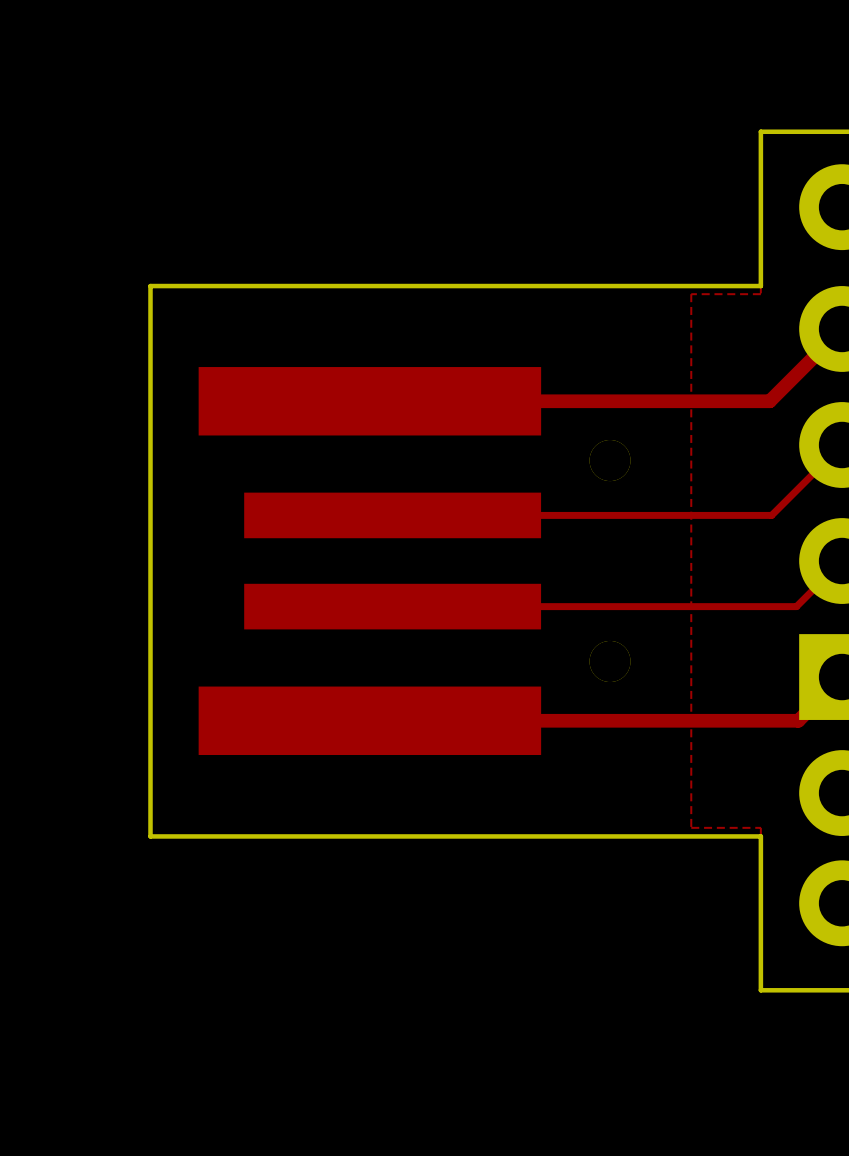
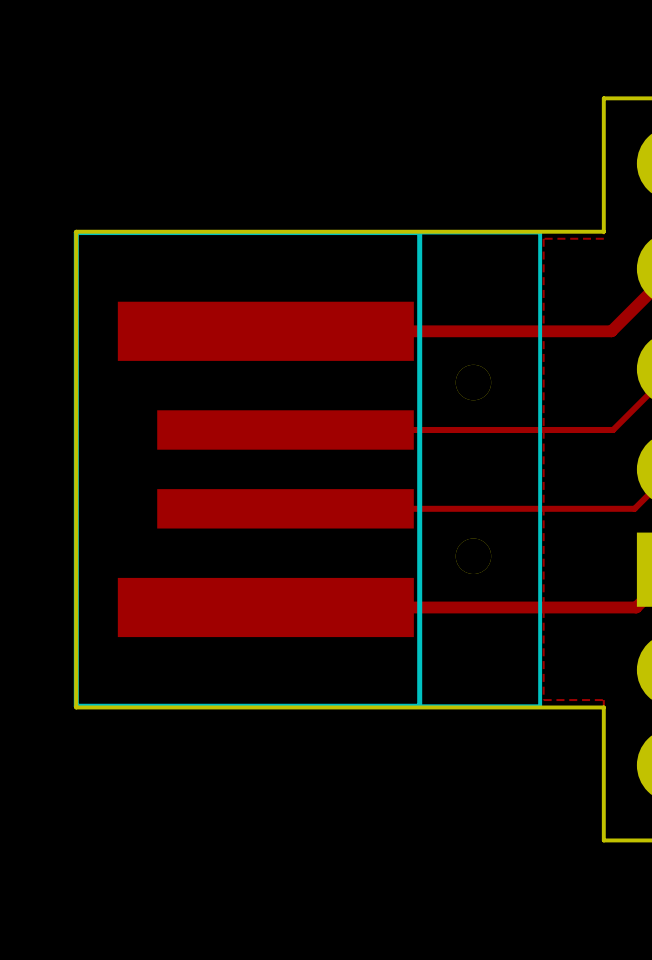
part: none -> (307, 469)

